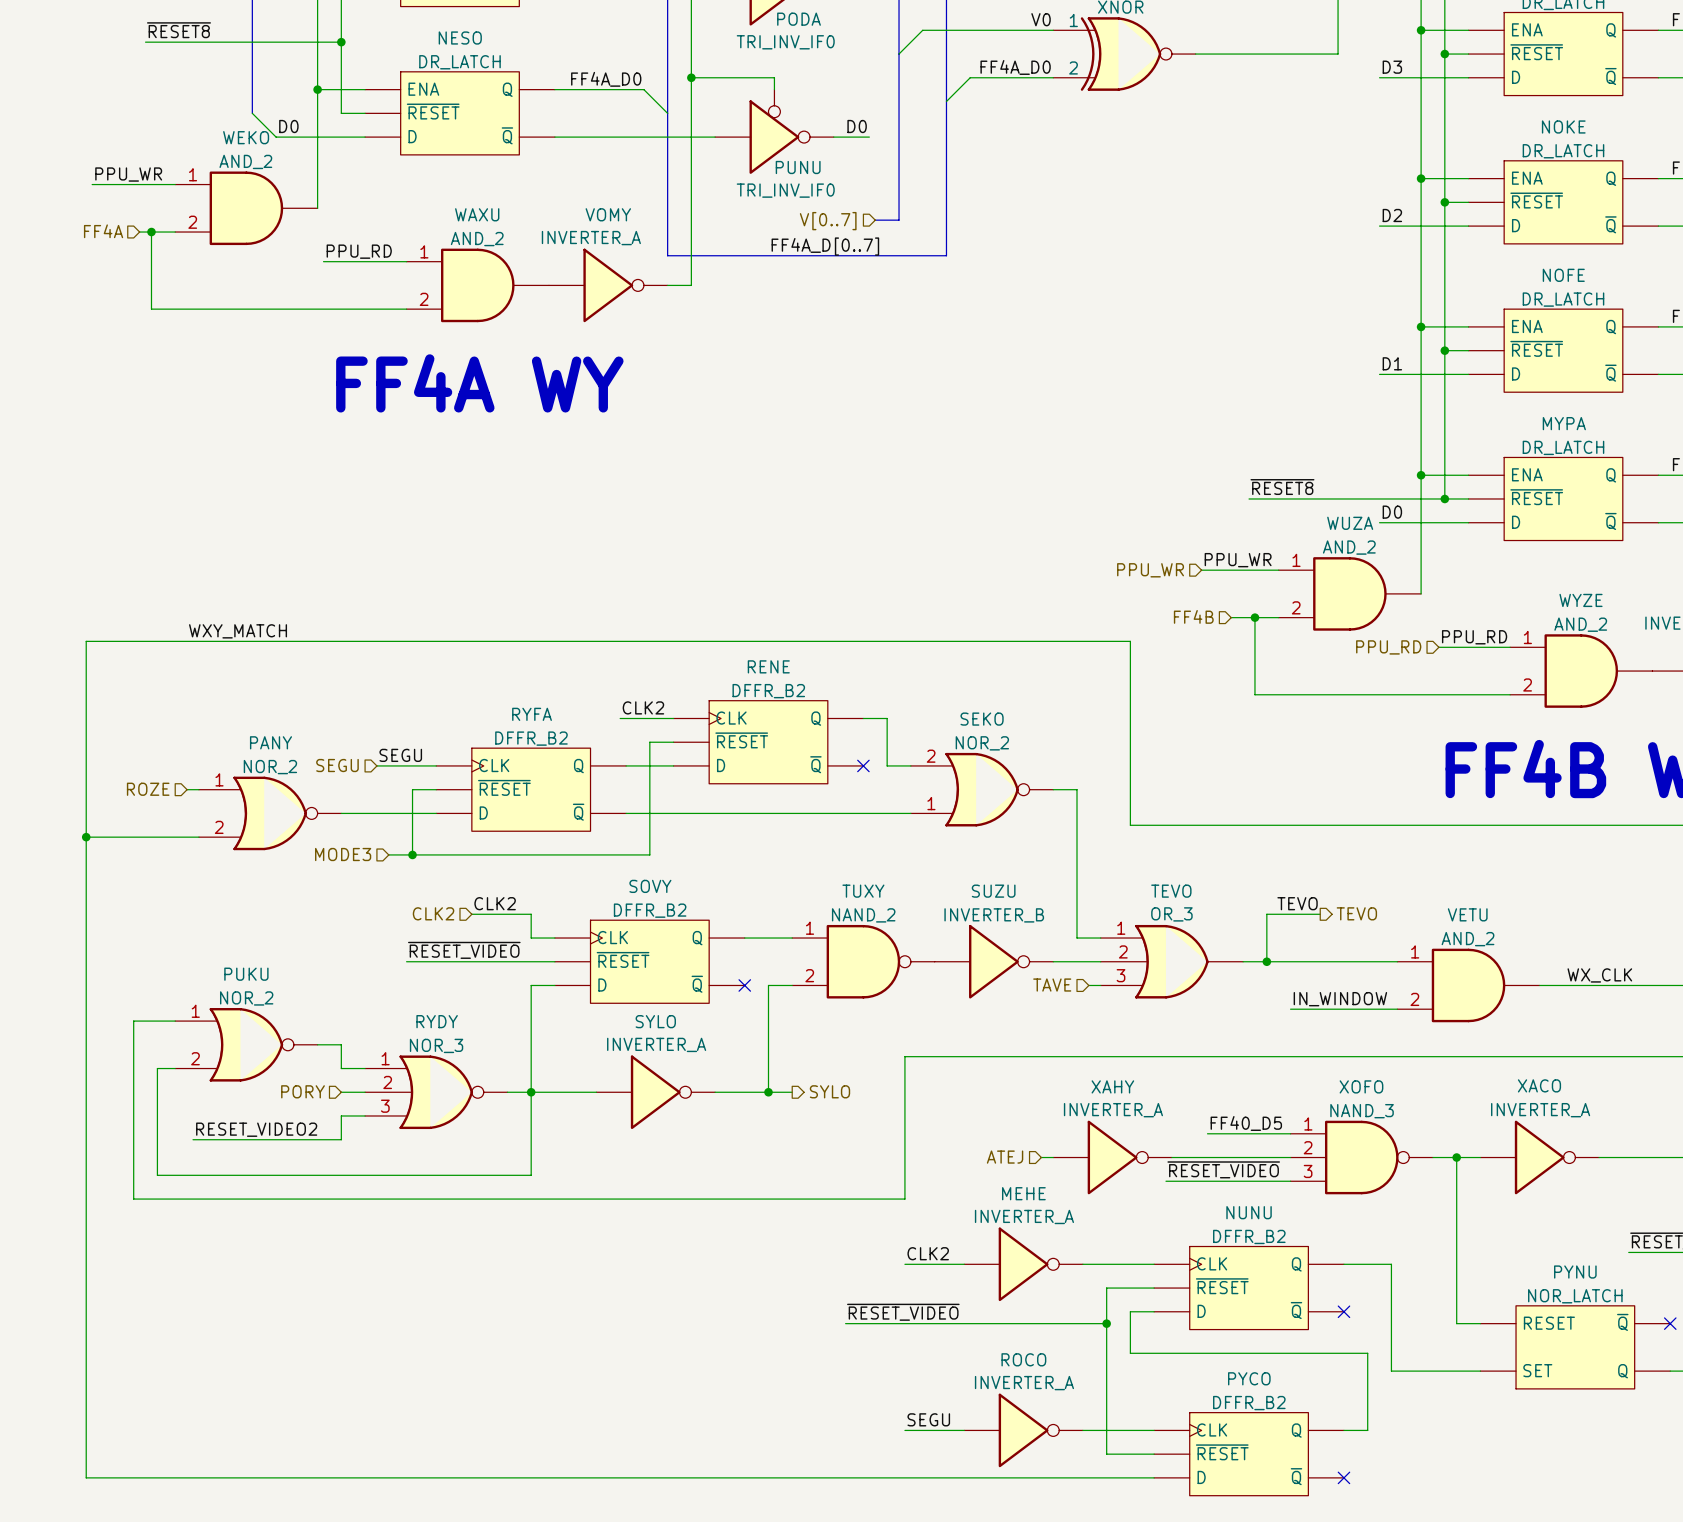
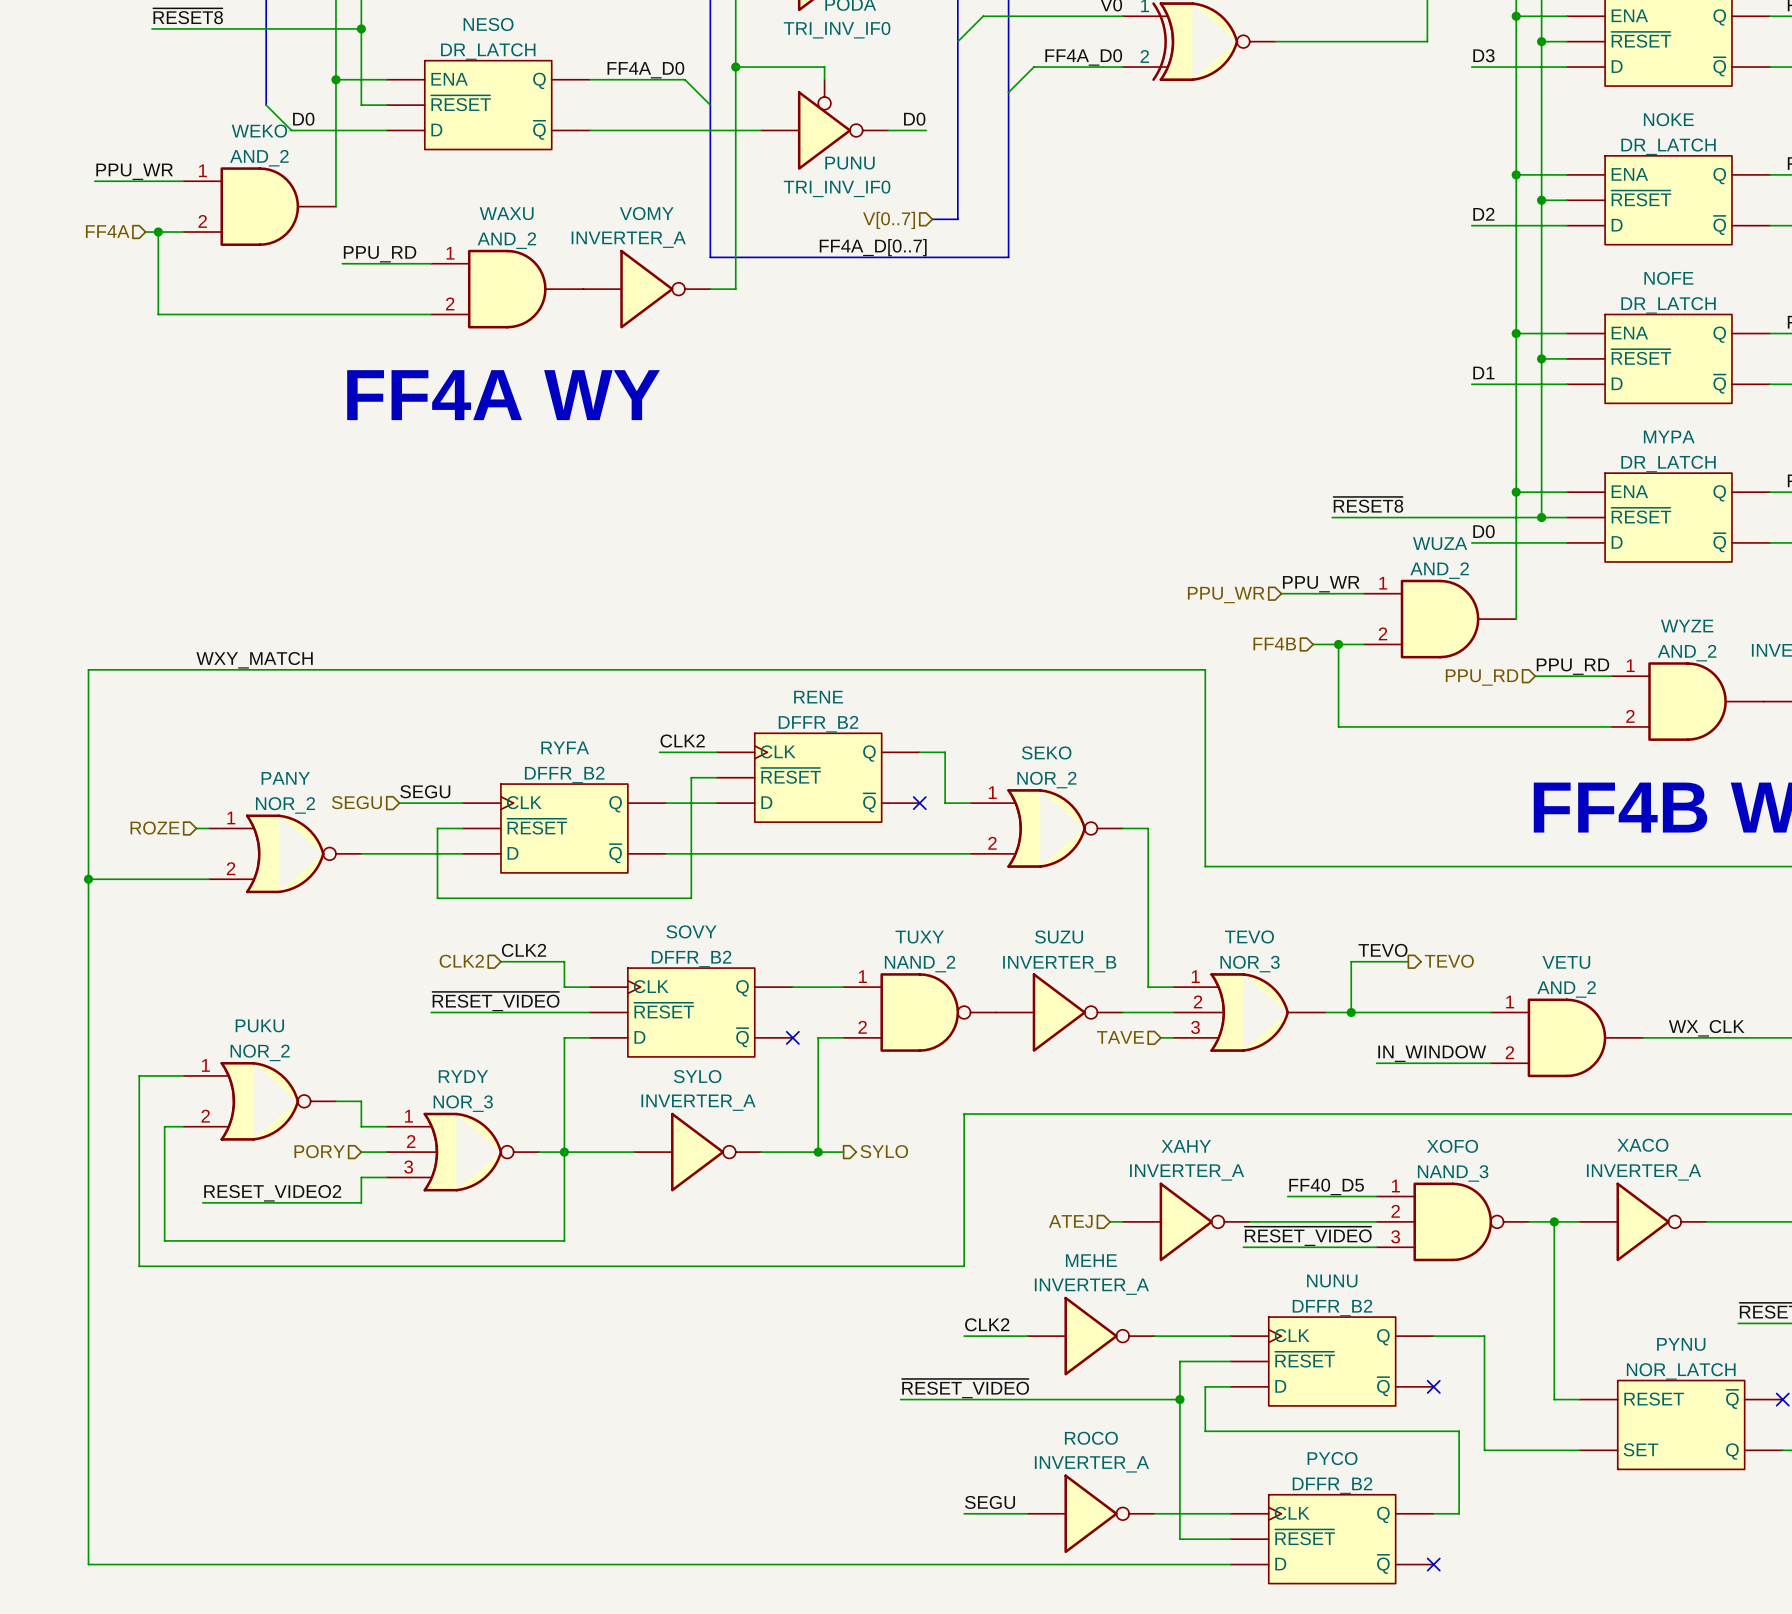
SEKO flip: as is (982, 789) -> up-down (1046, 828)
hierarchical label: MODE3 (343, 854) -> none
wire: (388, 854) (412, 854) -> none
junction: (412, 854) -> none
TEVO value: OR_3 (1171, 914) -> NOR_3 (1250, 964)

